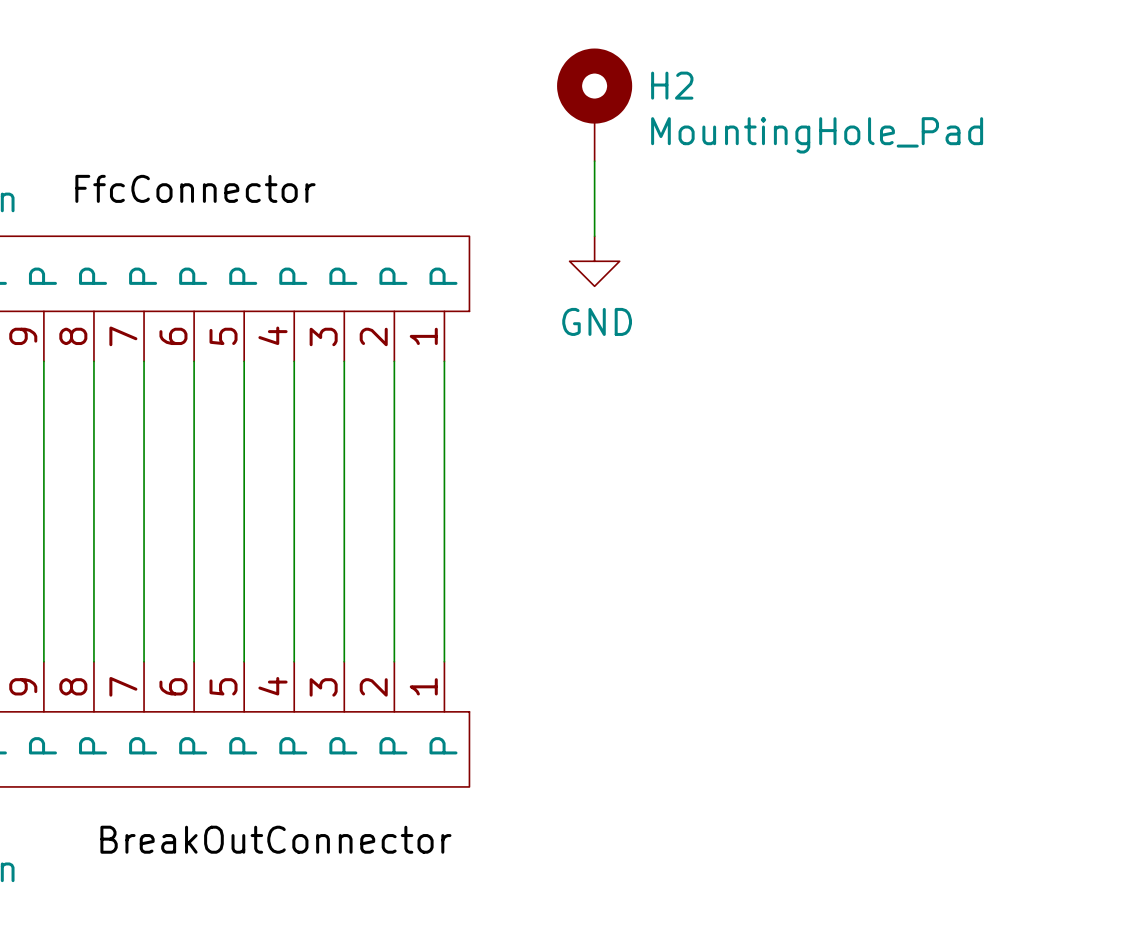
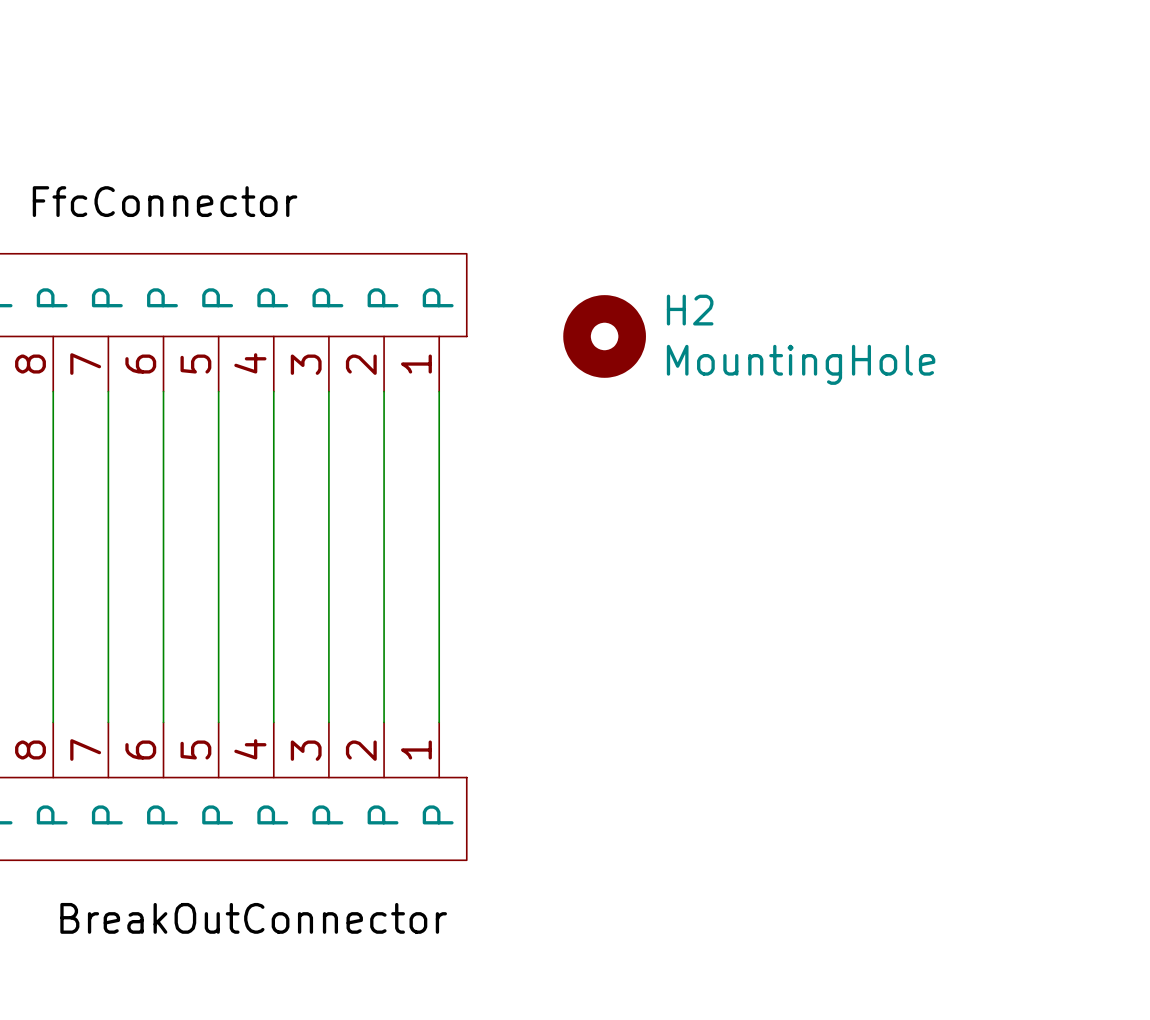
H2 symbol: [557, 48, 633, 162] -> [563, 295, 646, 378]
H2 value: MountingHole_Pad (817, 135) -> MountingHole (801, 364)
wire: (594, 161) (594, 236) -> none
power symbol: GND (594, 261) -> none

